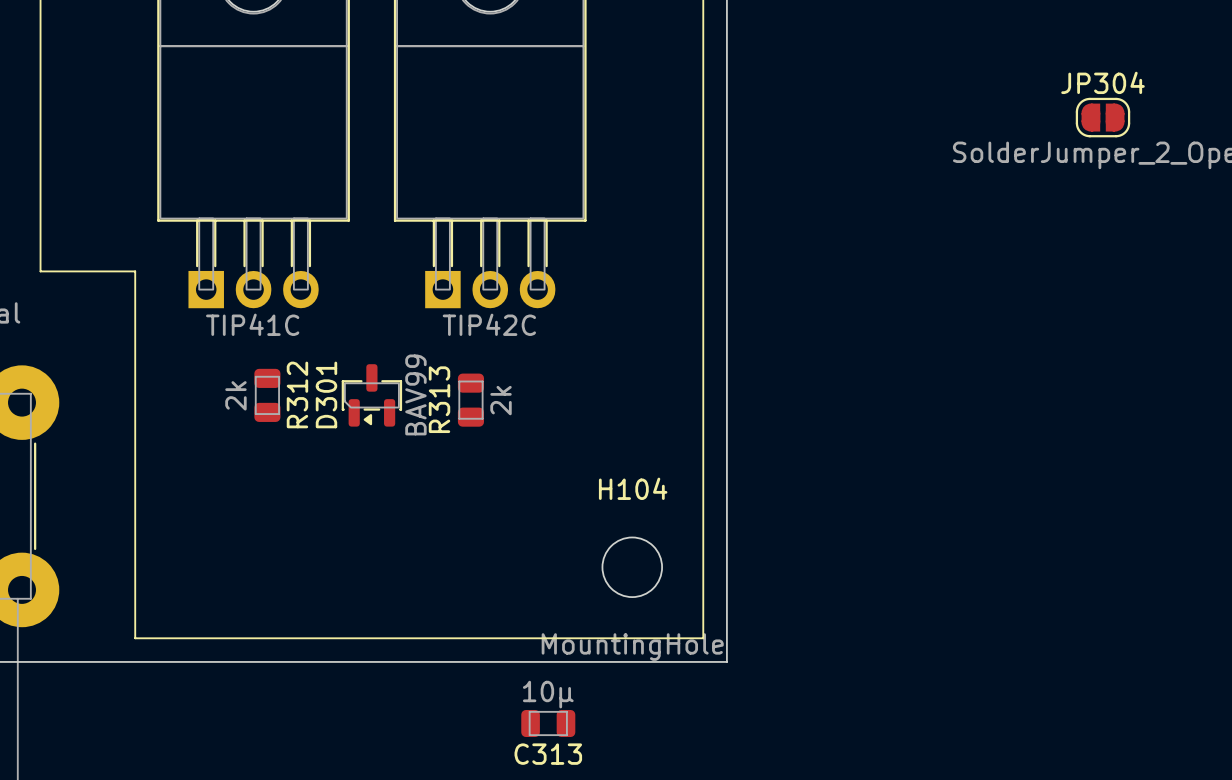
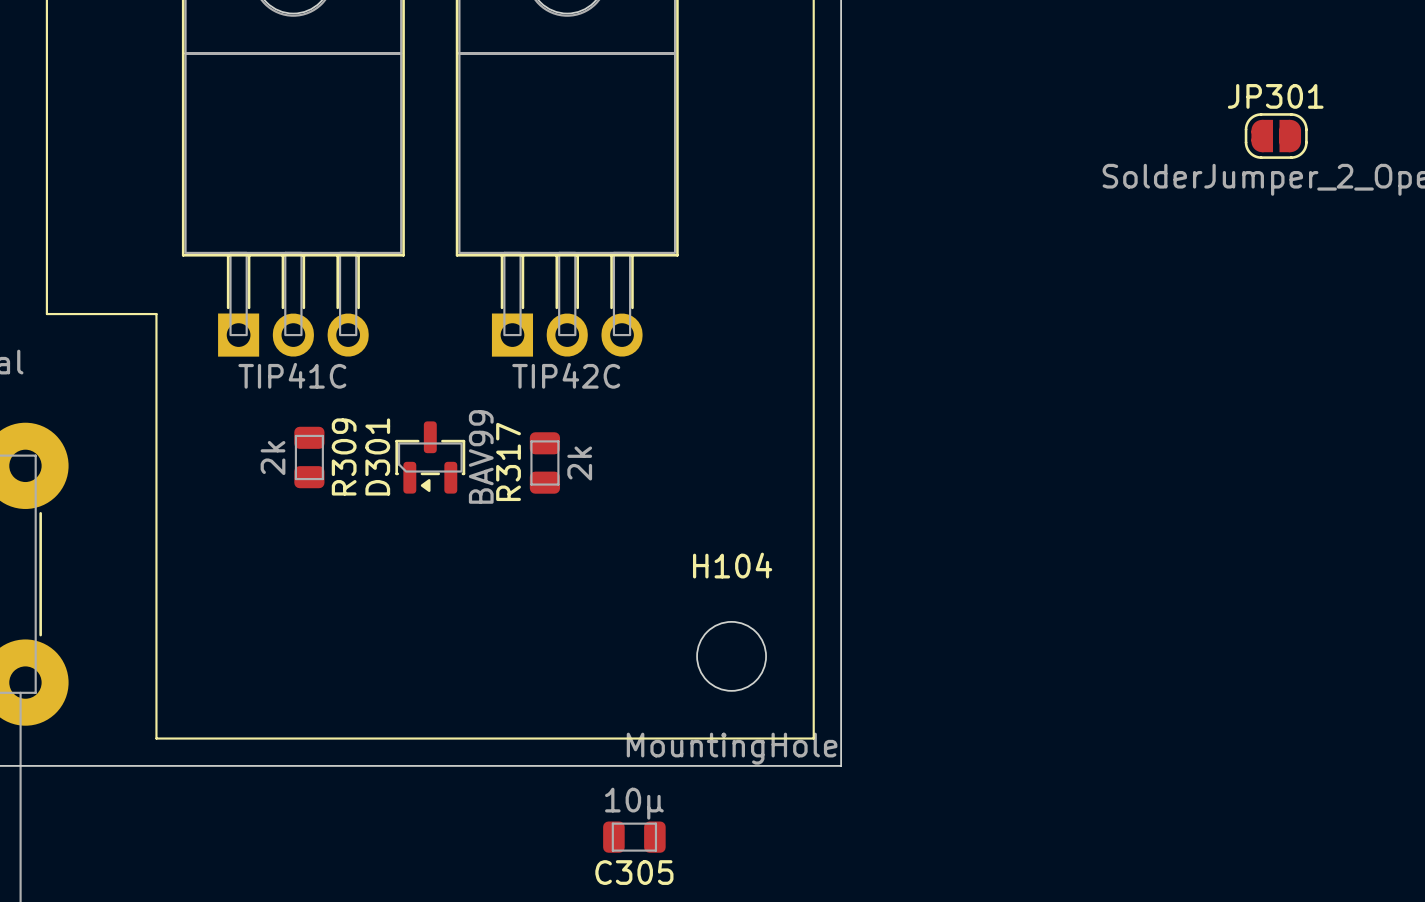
JP304 name: JP304 (1103, 82) -> JP301 (1275, 96)
R312 name: R312 (297, 394) -> R309 (344, 456)
R313 name: R313 (439, 399) -> R317 (508, 461)
C313 name: C313 (548, 754) -> C305 (634, 872)

